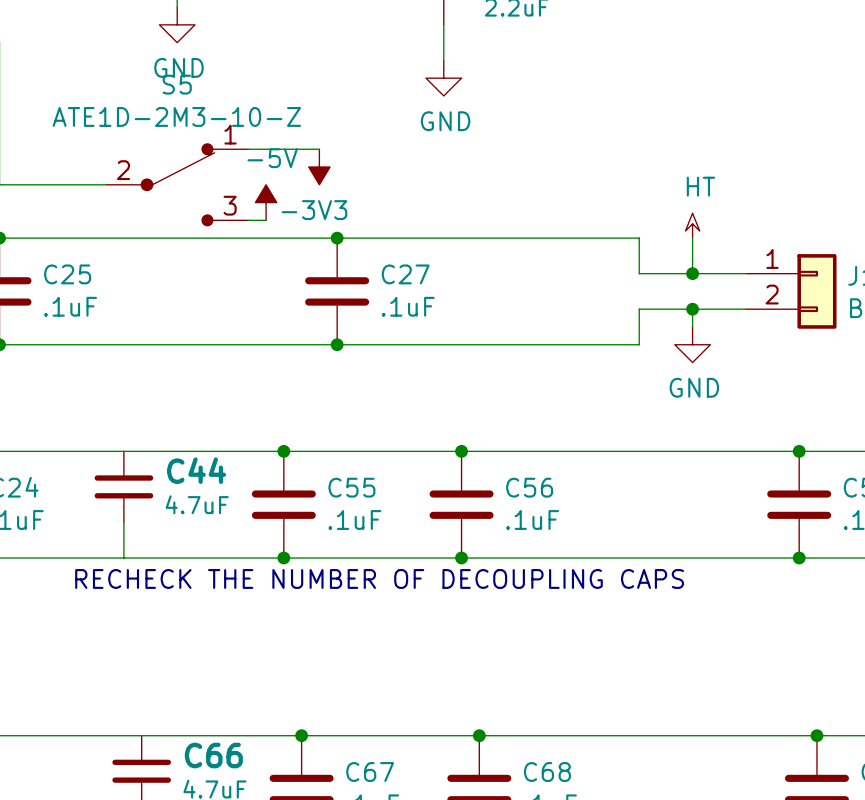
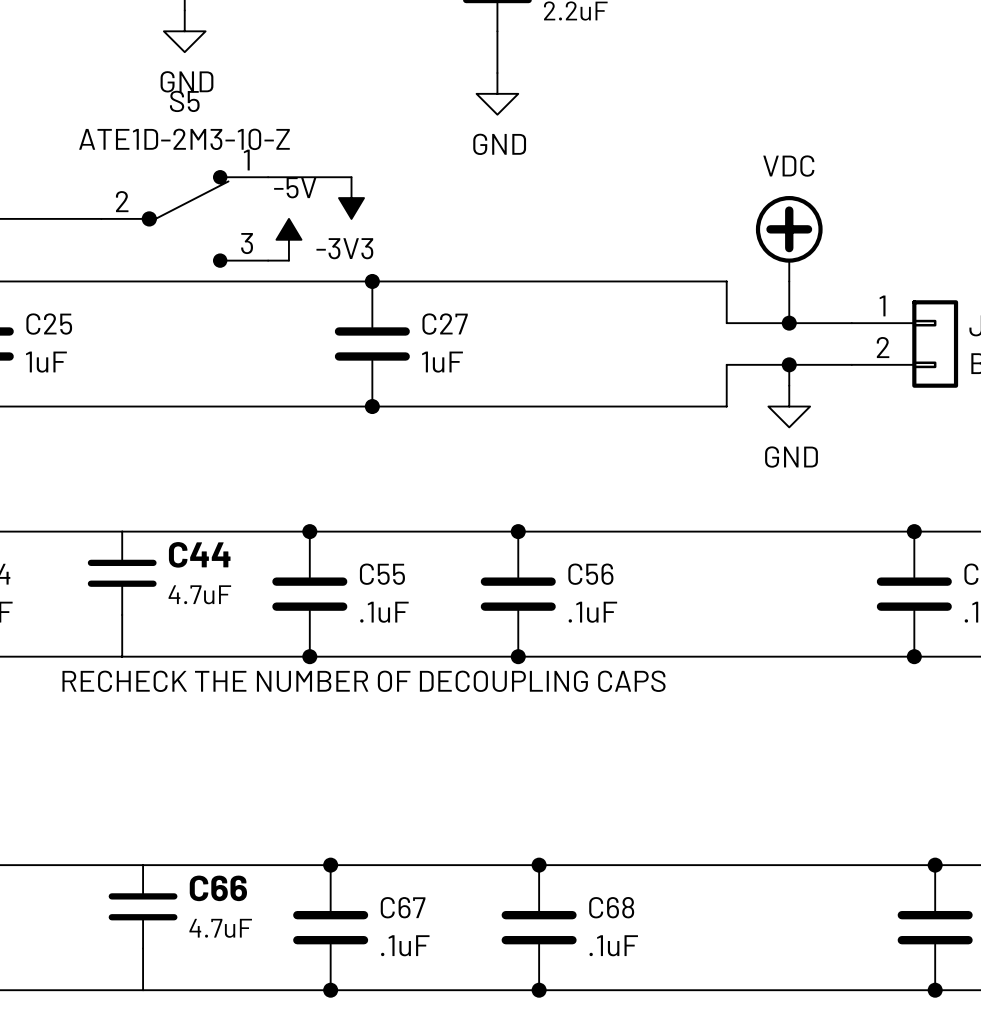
power symbol: none -> VDC (789, 238)
power symbol: HT (692, 225) -> none
C25 value: .1uF (70, 306) -> 1uF (46, 362)
C27 value: .1uF (408, 306) -> 1uF (442, 362)

